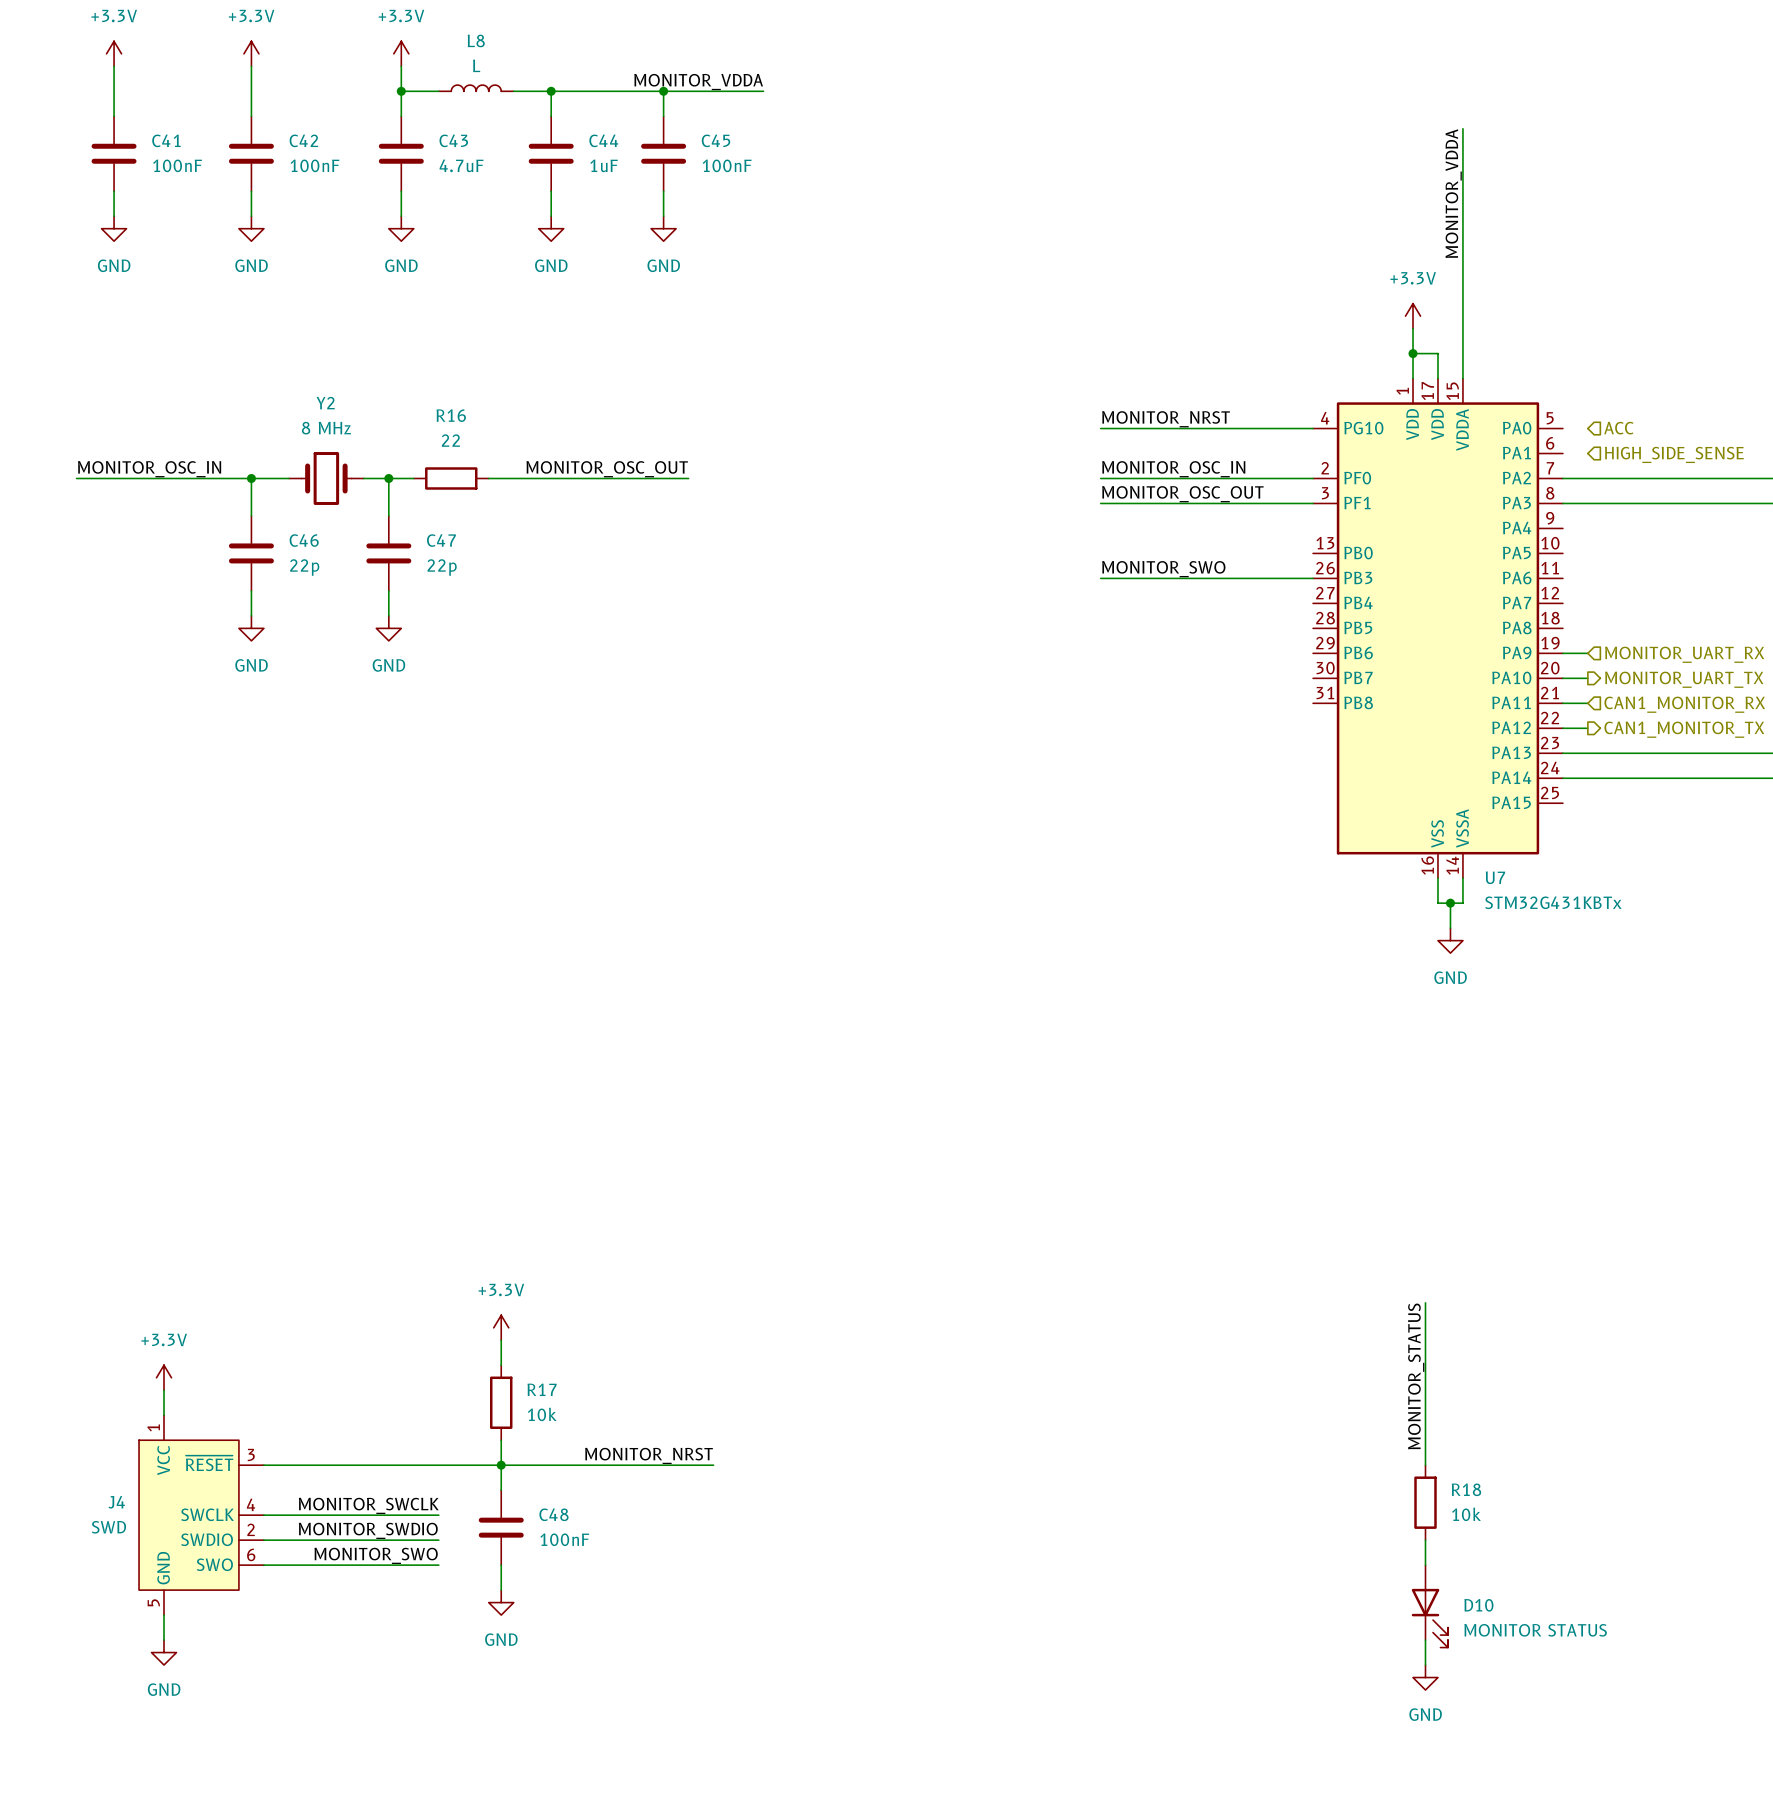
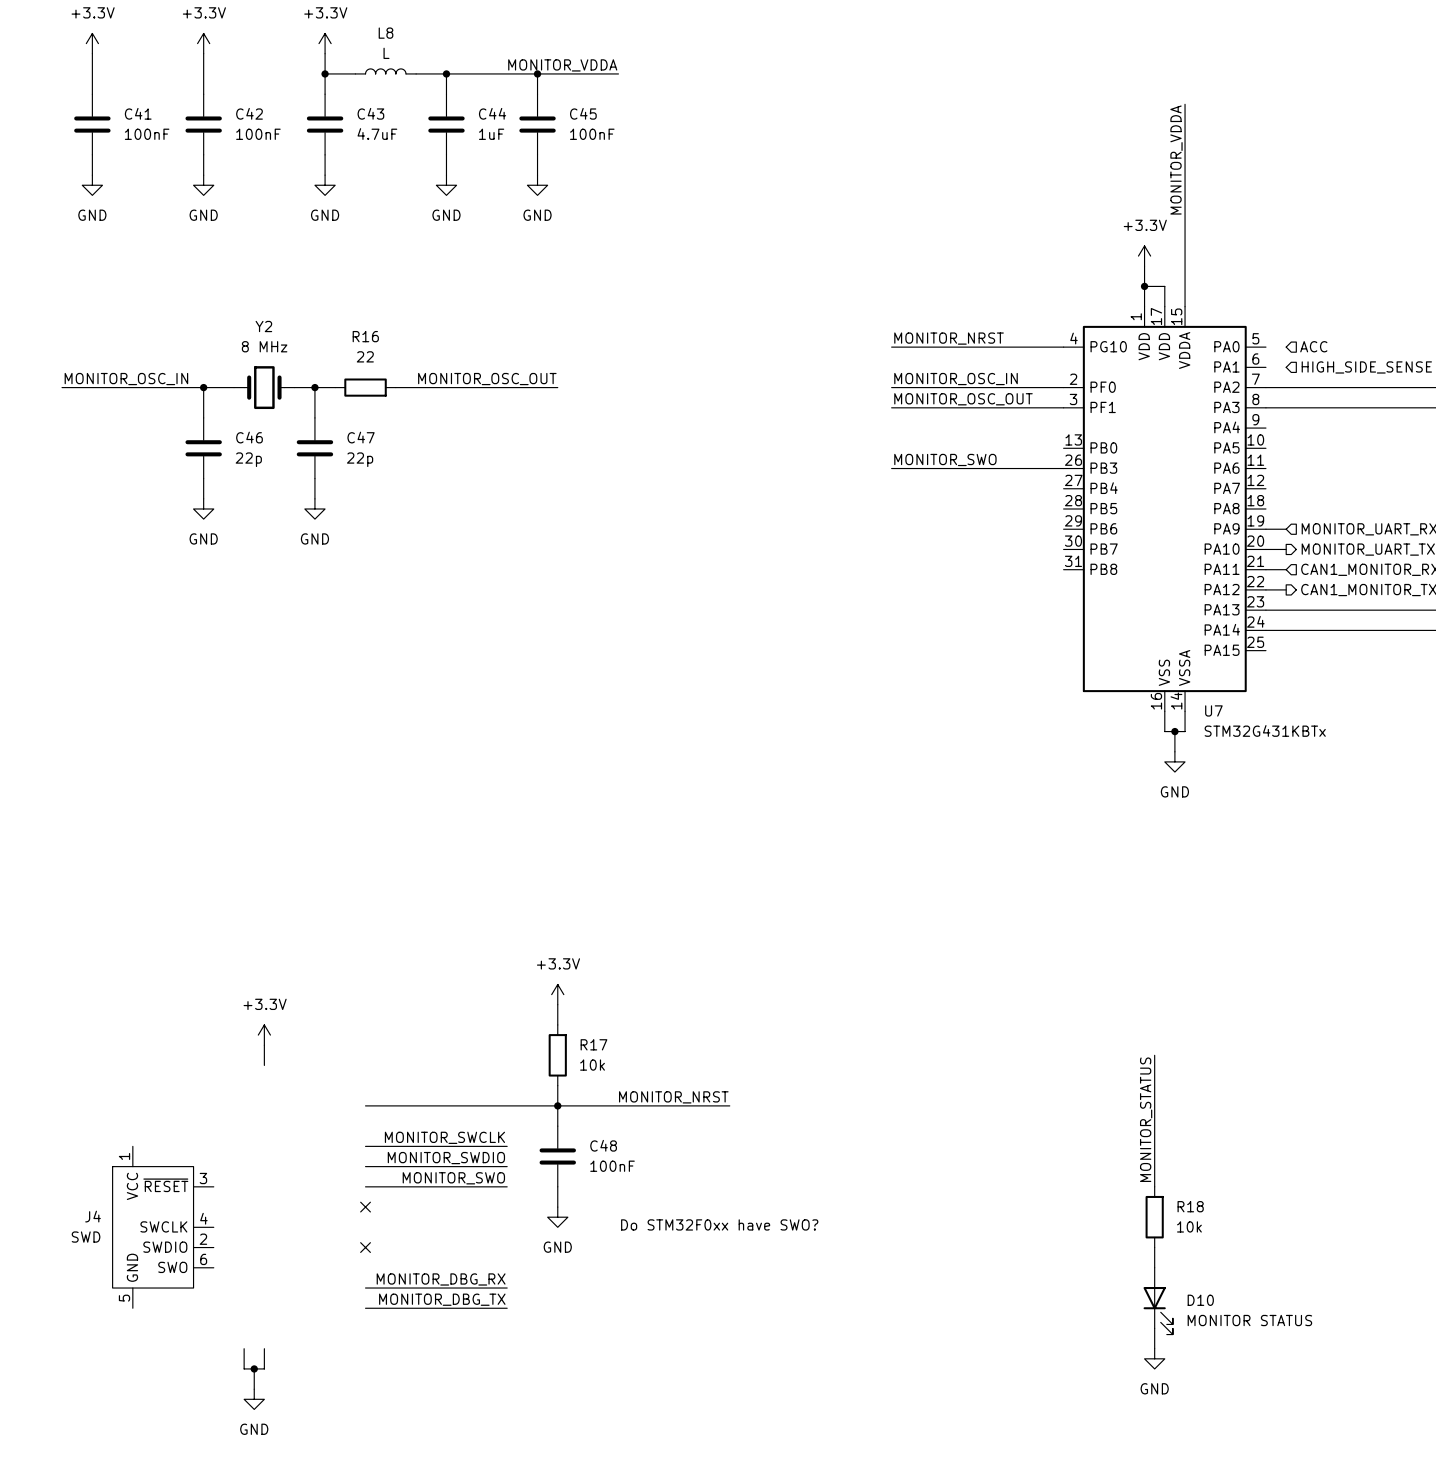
power symbol: none -> +3.3V (557, 994)
power symbol: none -> +3.3V (264, 1035)
power symbol: +3.3V (501, 1327) -> none
wire: (501, 1340) (501, 1365) -> (557, 1004) (557, 1024)
wire: none -> (365, 1105) (729, 1105)
junction: none -> (557, 1105)
power symbol: +3.3V (164, 1377) -> none
wire: (164, 1390) (164, 1415) -> (264, 1045) (264, 1065)
R17 position: (501, 1402) -> (557, 1055)
wire: (501, 1440) (501, 1490) -> (557, 1085) (557, 1126)
label position: MONITOR_NRST (649, 1455) -> MONITOR_NRST (673, 1097)
wire: (263, 1465) (451, 1465) -> none
junction: (501, 1465) -> none
wire: (626, 1465) (713, 1465) -> none
no-connect mark: none -> (365, 1207)
power symbol: none -> GND (557, 1217)
label position: MONITOR_SWCLK (368, 1505) -> MONITOR_SWCLK (444, 1137)
text: none -> Do STM32F0xx have SWO? (719, 1224)
wire: (263, 1515) (438, 1515) -> (365, 1146) (507, 1146)
C48 position: (501, 1527) -> (557, 1156)
label position: MONITOR_SWDIO (368, 1530) -> MONITOR_SWDIO (446, 1158)
wire: (263, 1540) (438, 1540) -> (365, 1166) (507, 1166)
no-connect mark: none -> (365, 1247)
label position: MONITOR_SWO (376, 1555) -> MONITOR_SWO (453, 1178)
wire: (263, 1565) (438, 1565) -> (365, 1308) (507, 1308)
wire: (501, 1565) (501, 1590) -> (557, 1186) (557, 1207)
label: none -> MONITOR_DBG_RX (441, 1279)
wire: none -> (365, 1288) (507, 1288)
power symbol: GND (501, 1602) -> none
label: none -> MONITOR_DBG_TX (442, 1299)
wire: (164, 1615) (164, 1640) -> (254, 1368) (254, 1389)
power symbol: GND (164, 1652) -> none
wire: none -> (244, 1348) (244, 1368) (264, 1368) (264, 1348)
junction: none -> (254, 1368)
power symbol: none -> GND (254, 1399)

